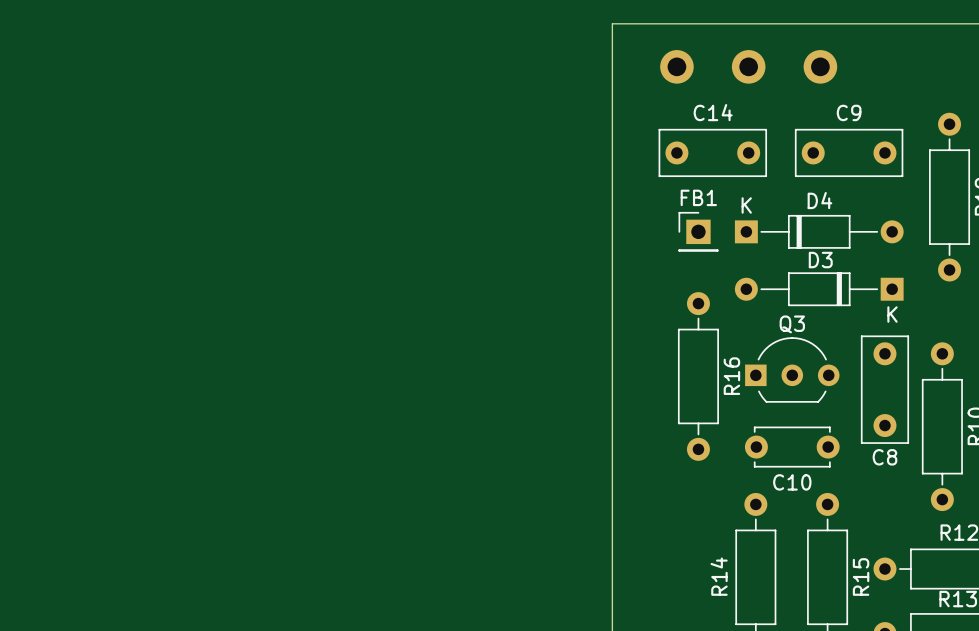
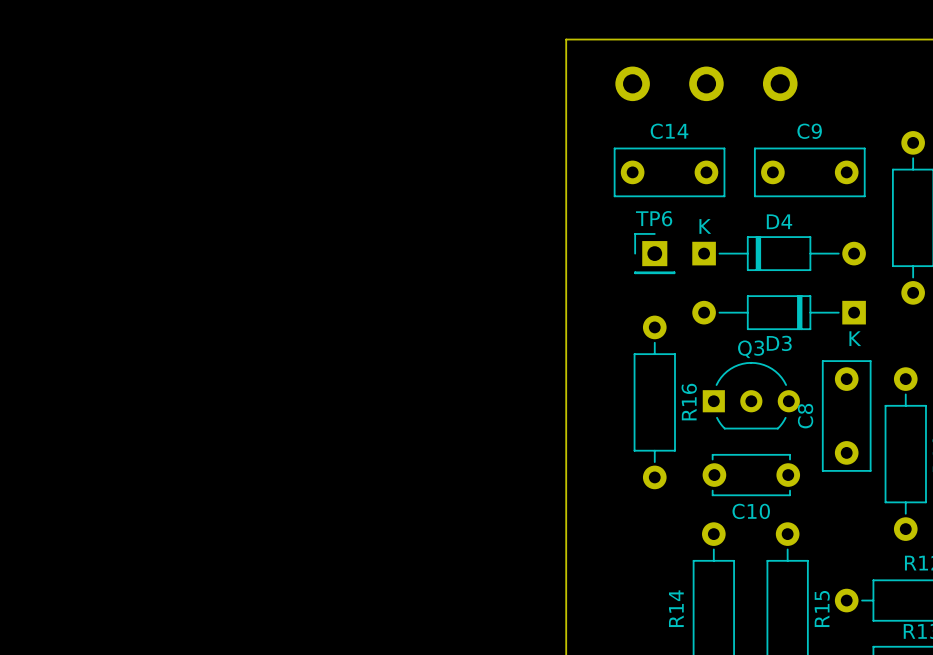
FB1 name: FB1 (698, 197) -> TP6 (654, 218)
D3 name position: D3 (820, 260) -> D3 (779, 343)
C8 name rotation: 0° (884, 457) -> 90° counterclockwise (805, 416)
C8 name position: C8 (884, 457) -> C8 (805, 416)

